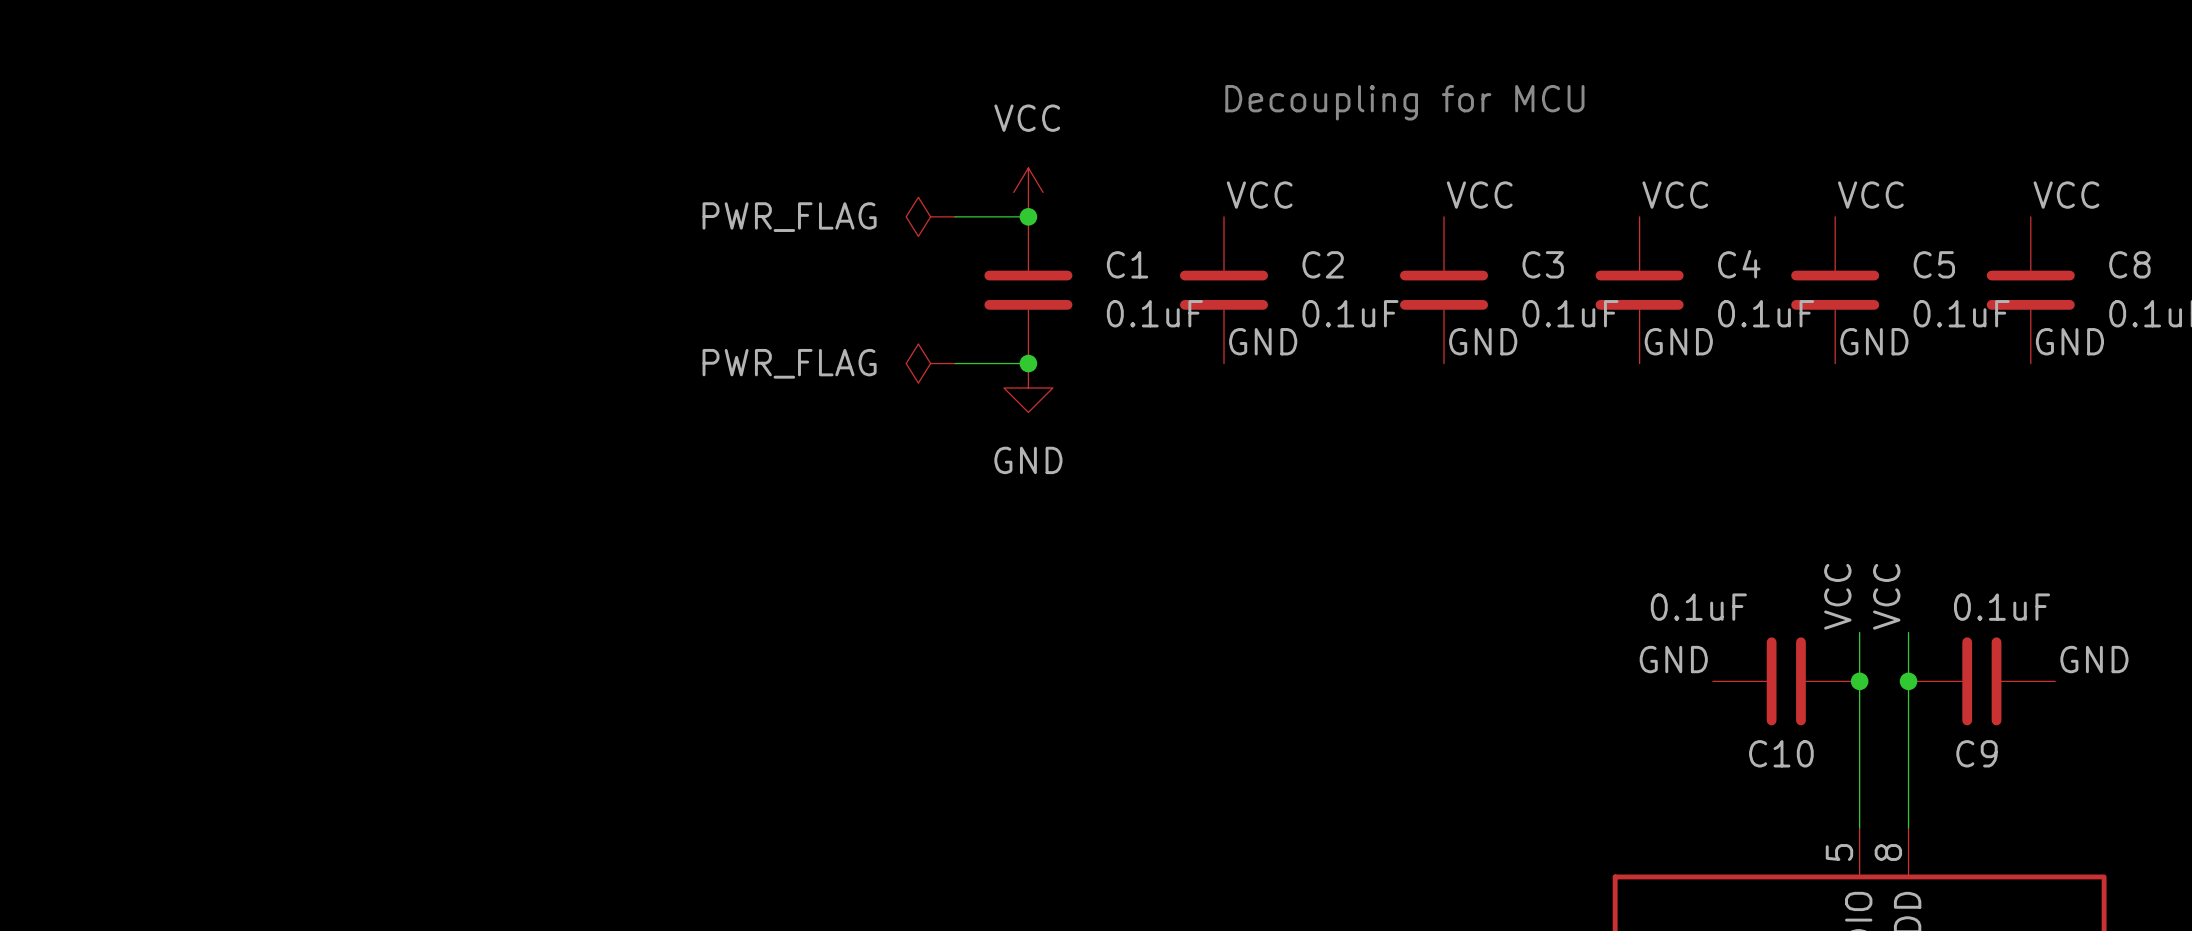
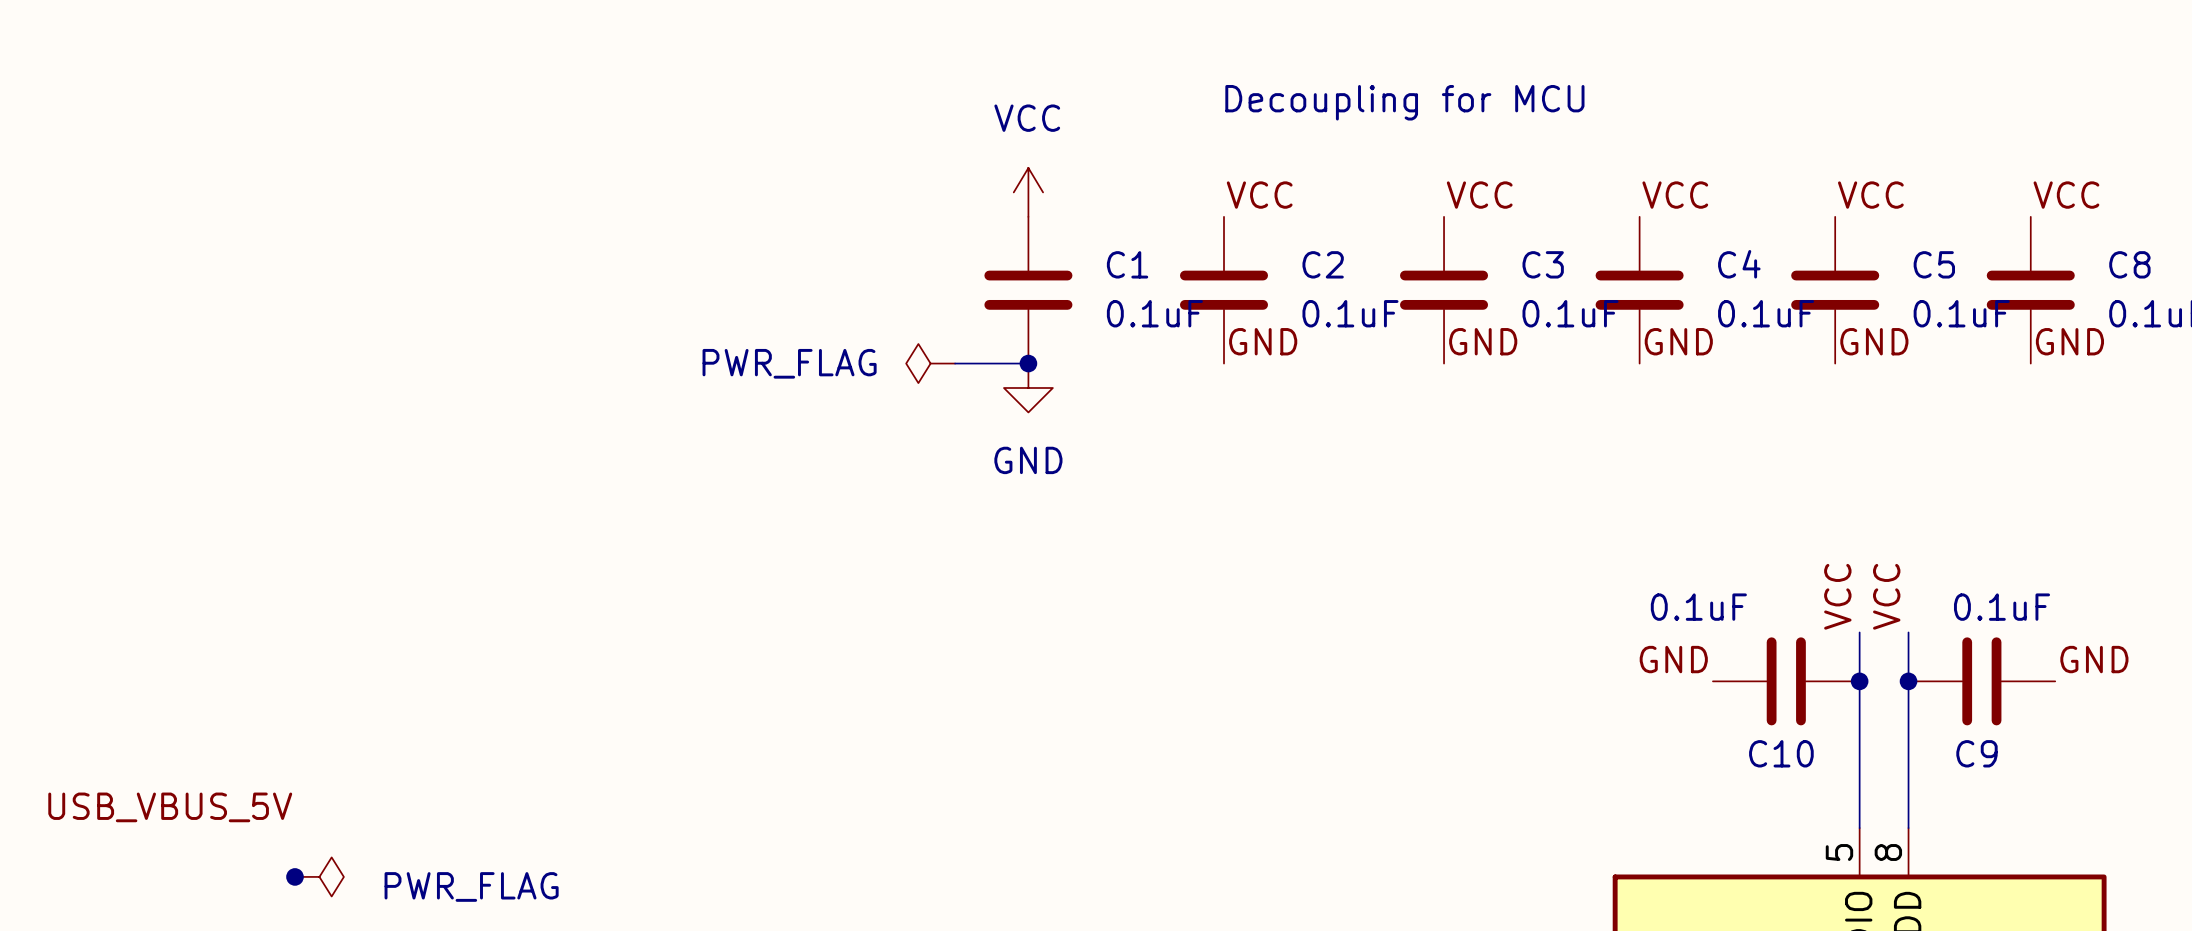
power symbol: PWR_FLAG (930, 216) -> none
wire: (955, 216) (1028, 216) -> none
junction: (1028, 216) -> none
label: none -> USB_VBUS_5V (170, 807)
junction: none -> (294, 876)
power symbol: none -> PWR_FLAG (319, 876)

